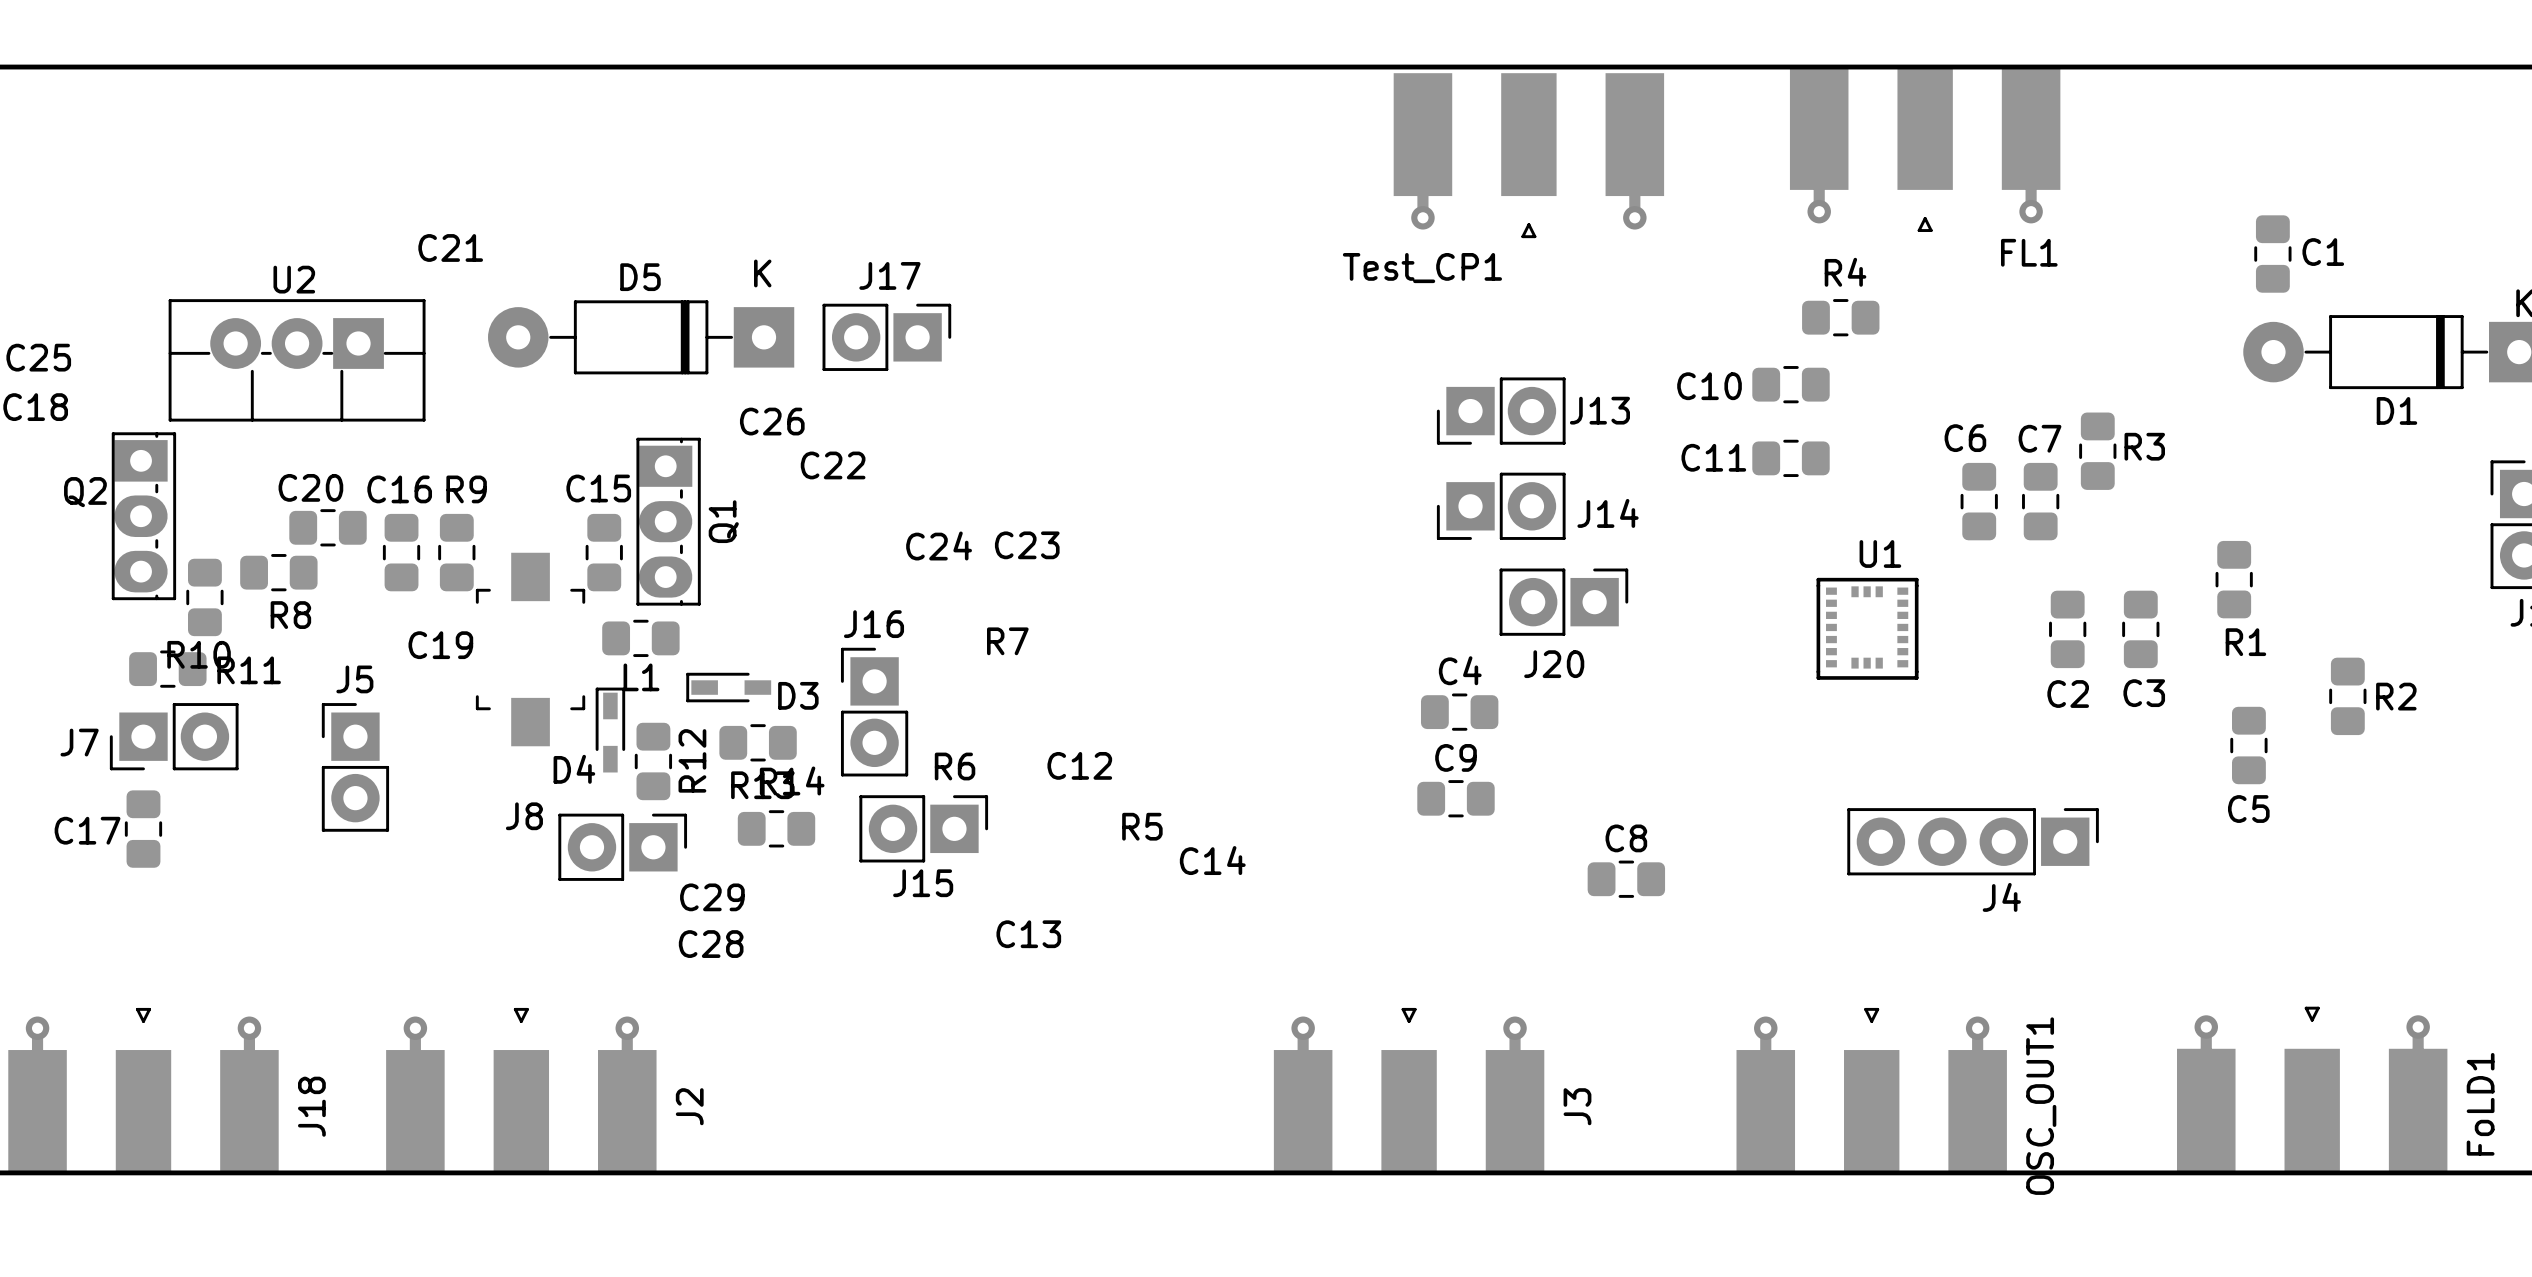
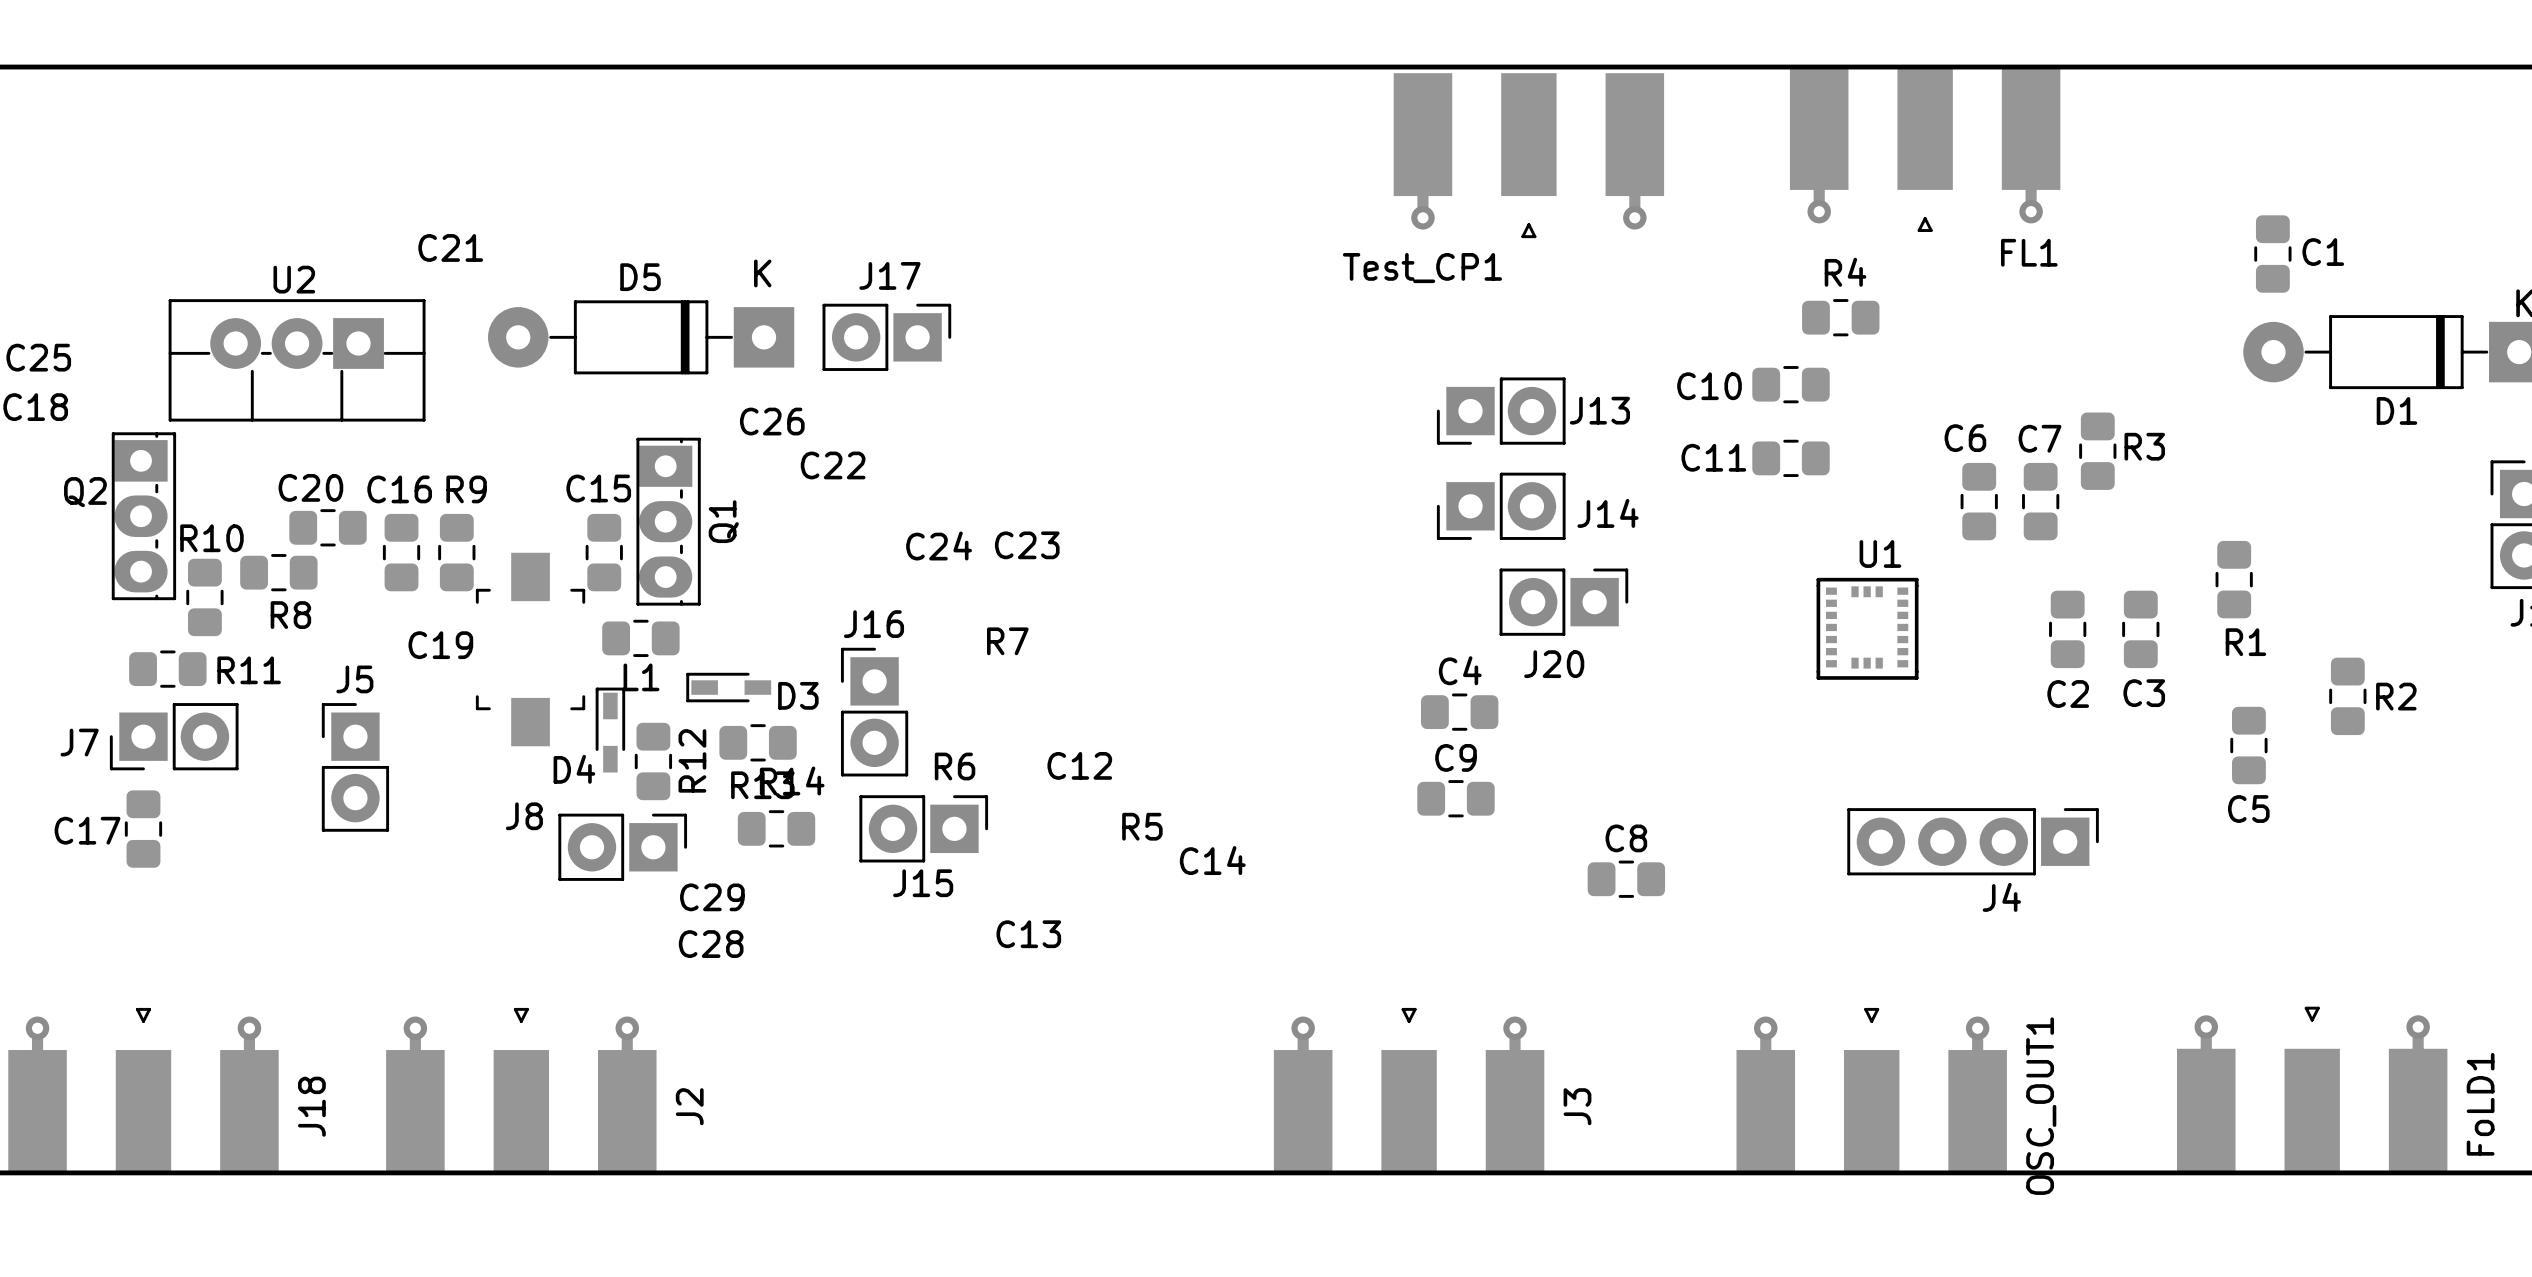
R10 name position: R10 (199, 654) -> R10 (211, 538)

